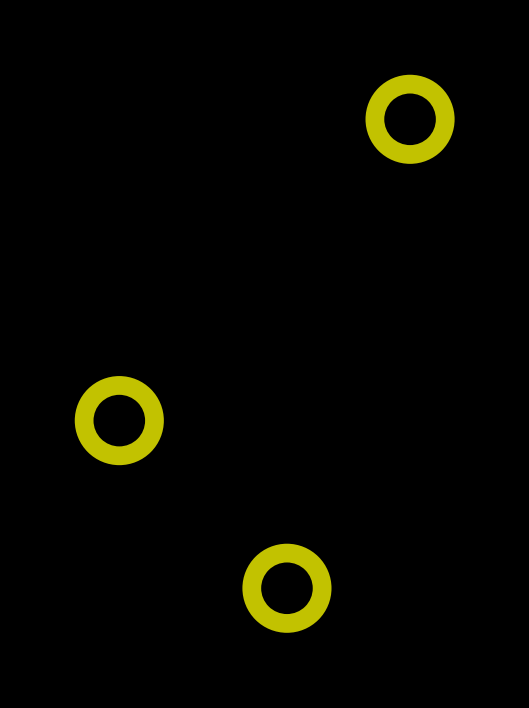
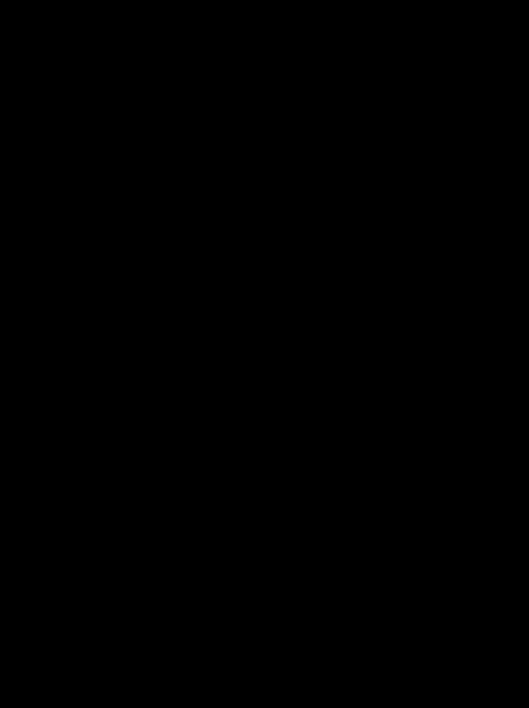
part: (410, 119) -> none
part: (119, 420) -> none
part: (286, 588) -> none

